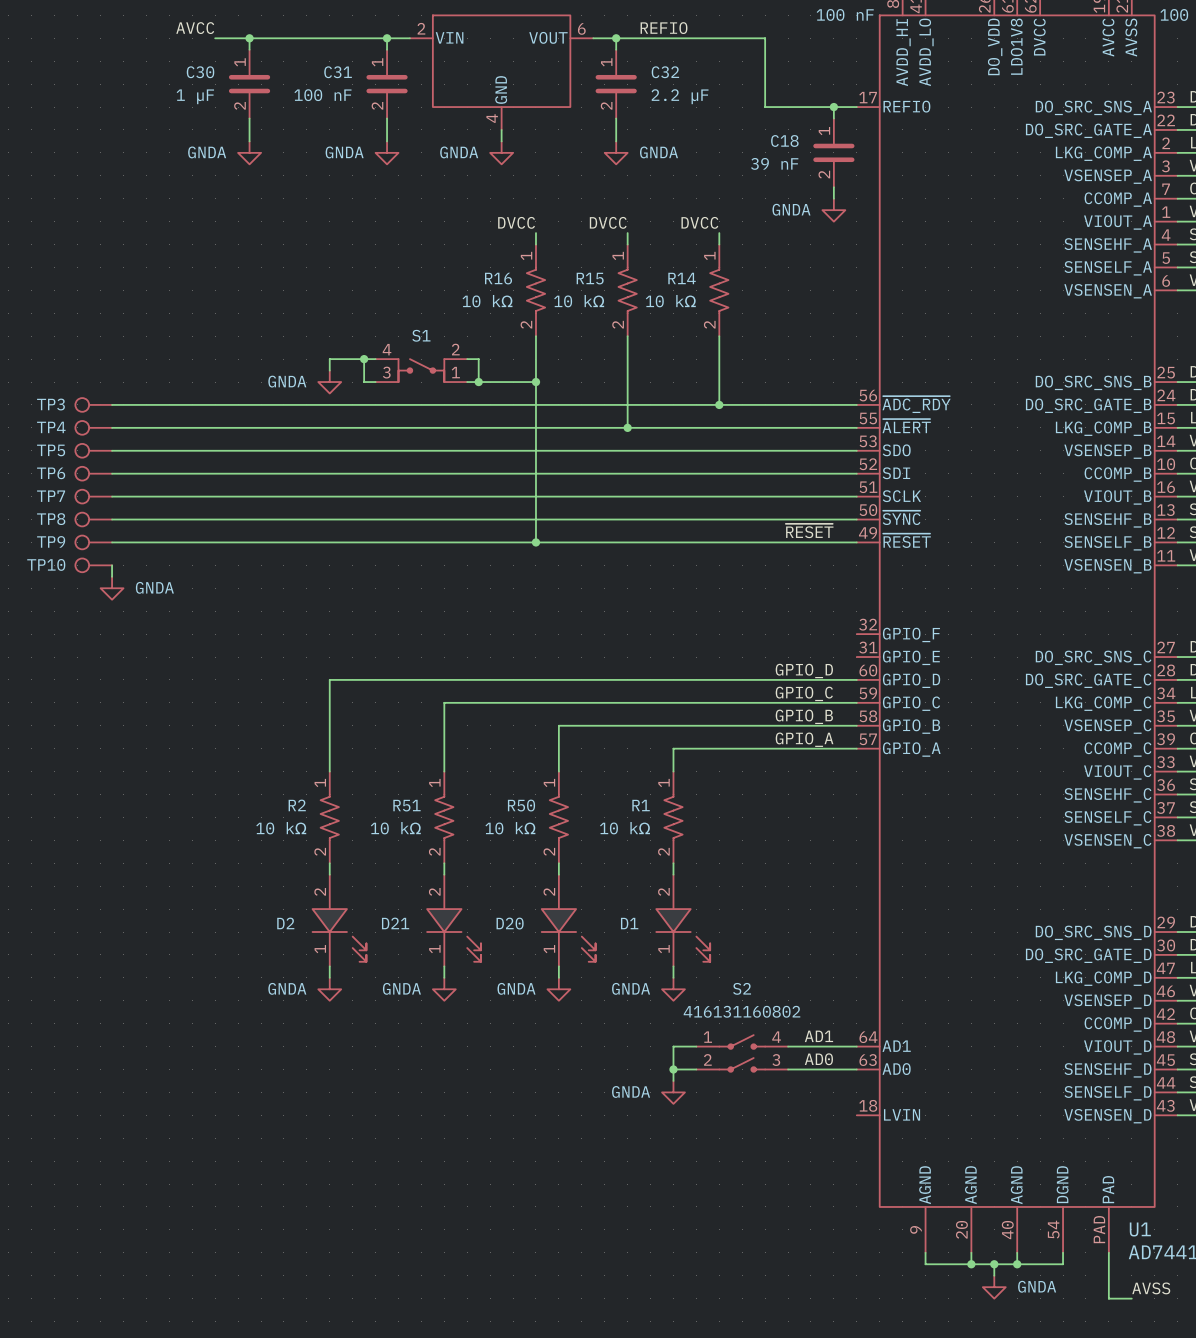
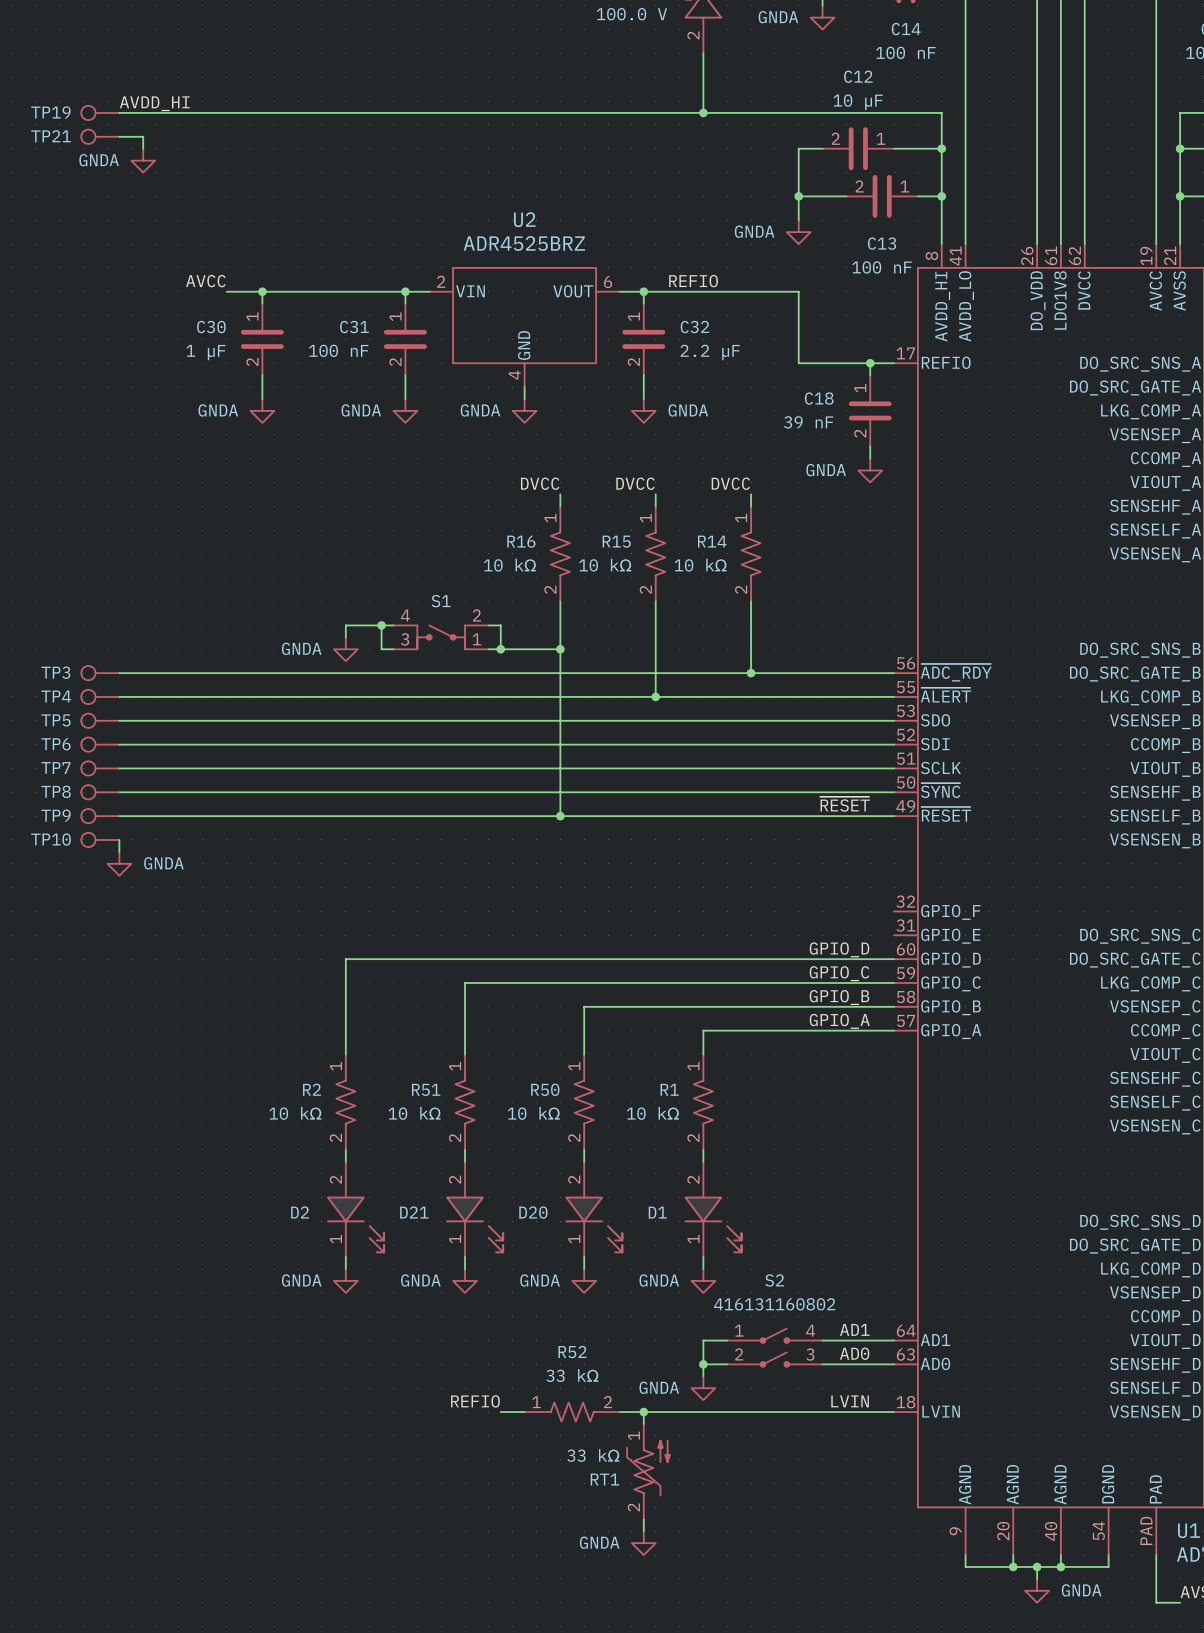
label: none -> REFIO (475, 1401)
label: none -> LVIN (850, 1401)
wire: none -> (500, 1412) (524, 1412)
R52: none -> 33 kΩ (572, 1412)
wire: none -> (619, 1412) (894, 1412)
wire: none -> (643, 1412) (643, 1423)
junction: none -> (643, 1412)
RT1: none -> 33 kΩ (648, 1471)
wire: none -> (643, 1519) (643, 1531)
power symbol: none -> GNDA (643, 1543)

